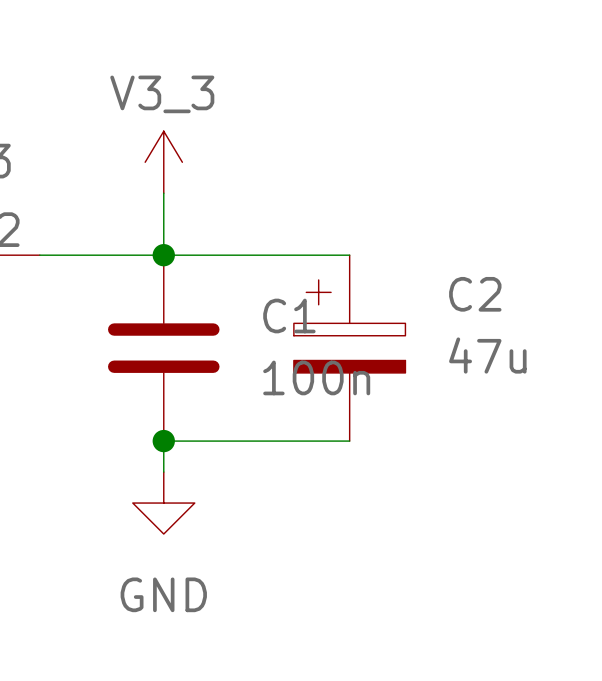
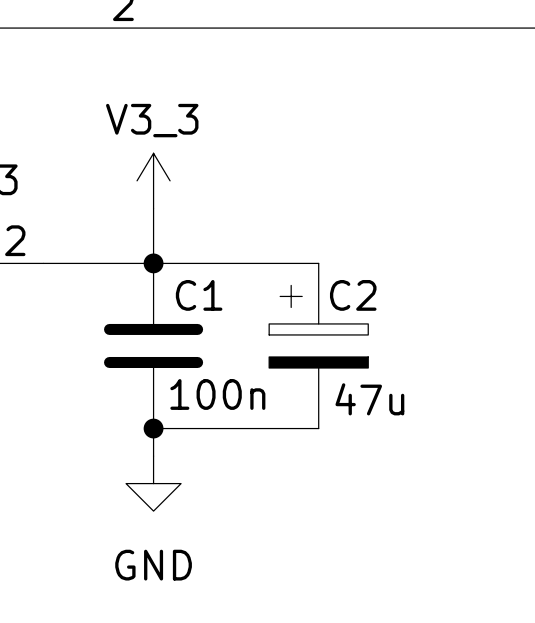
C2 name position: C2 (475, 294) -> C2 (353, 295)
C1 name position: C1 (289, 315) -> C1 (199, 295)
C2 value position: 47u (487, 355) -> 47u (369, 399)
C1 value position: 100n (316, 377) -> 100n (217, 394)

